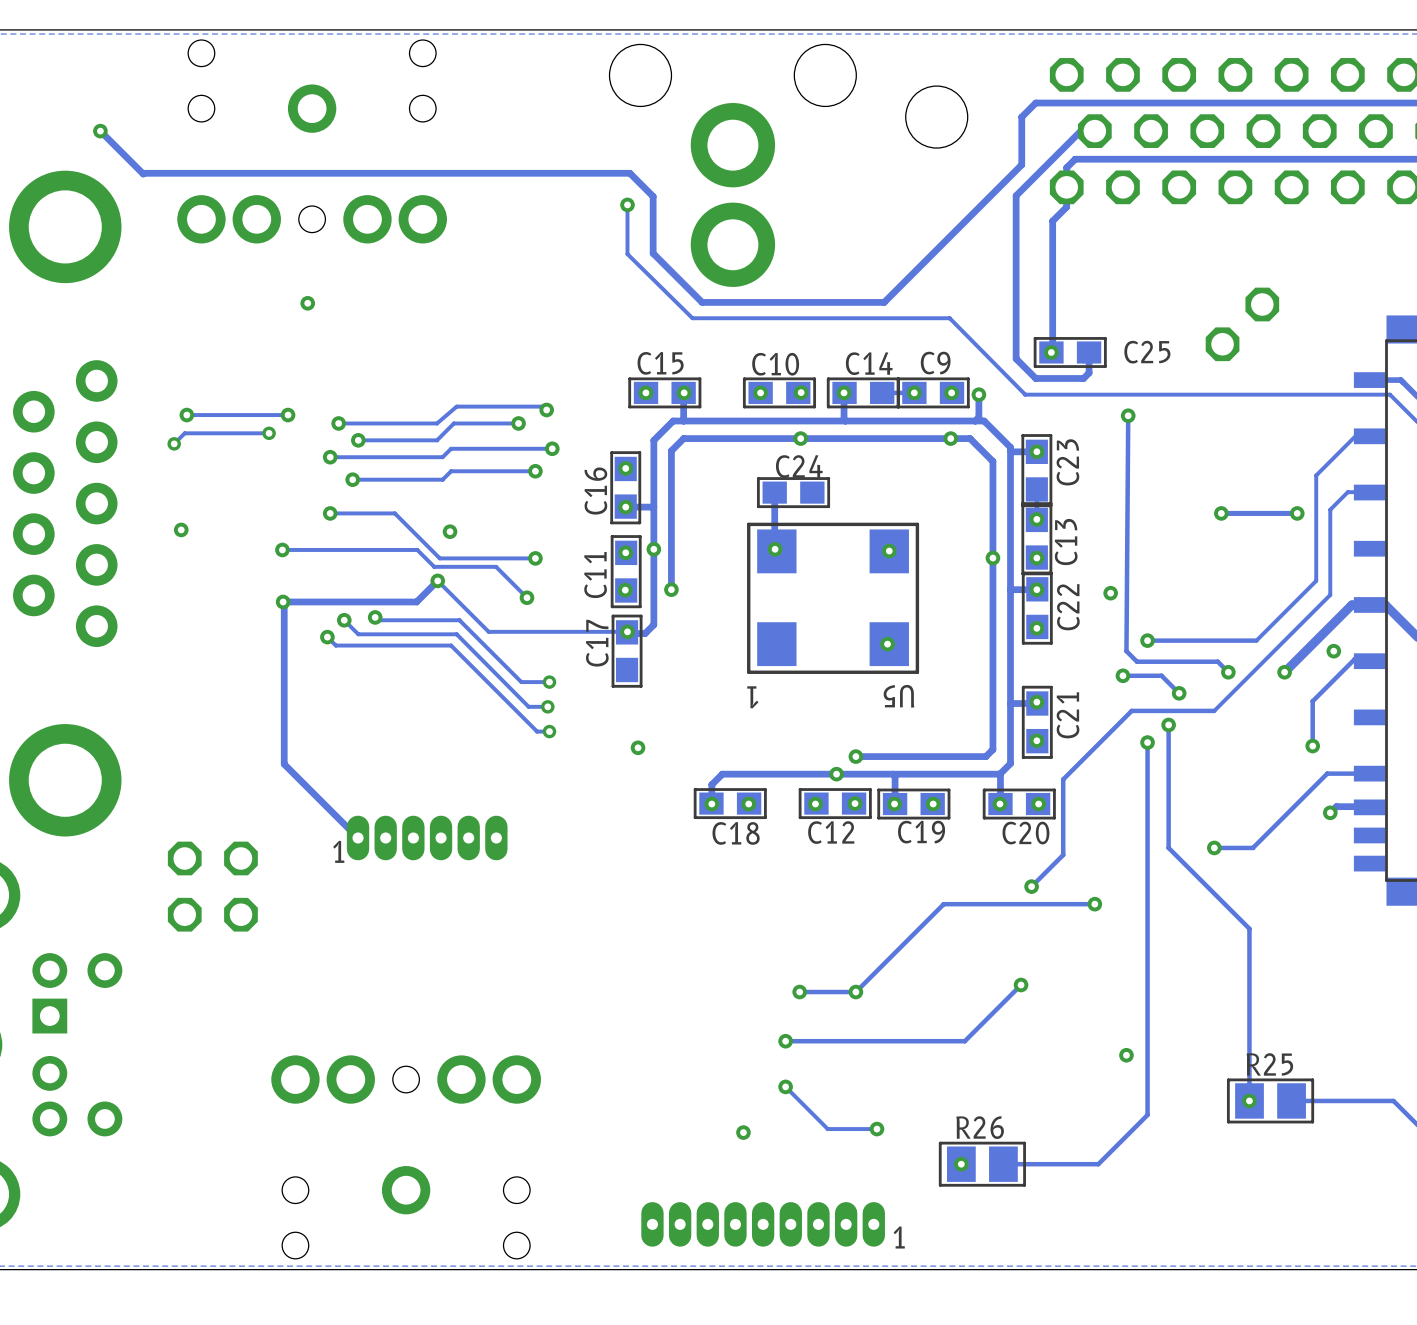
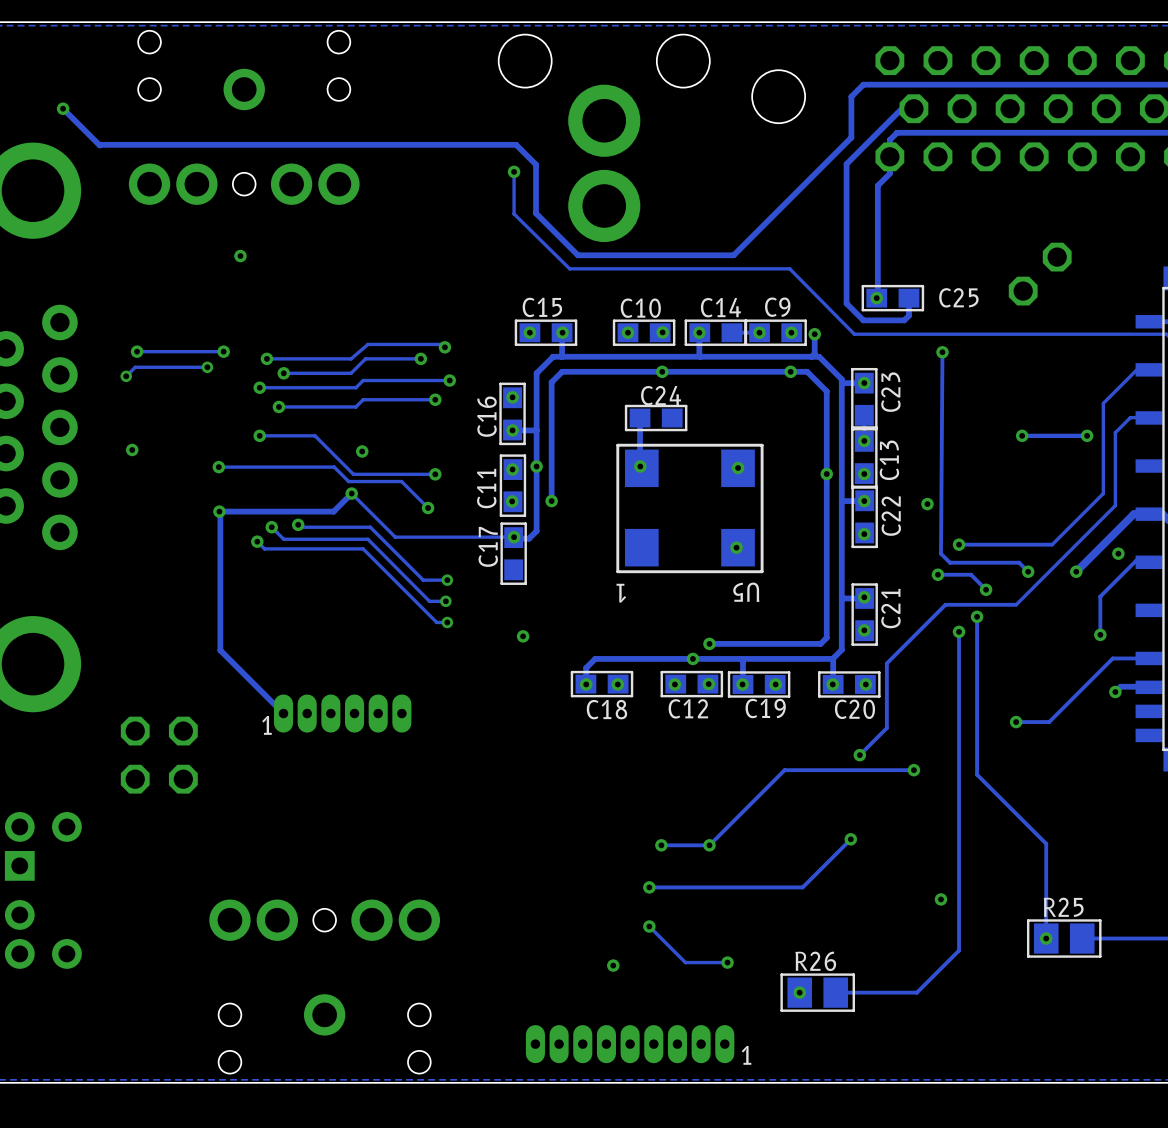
track: (1168, 847) (1249, 928) (1249, 990) -> (977, 722) (977, 774) (1046, 843)

